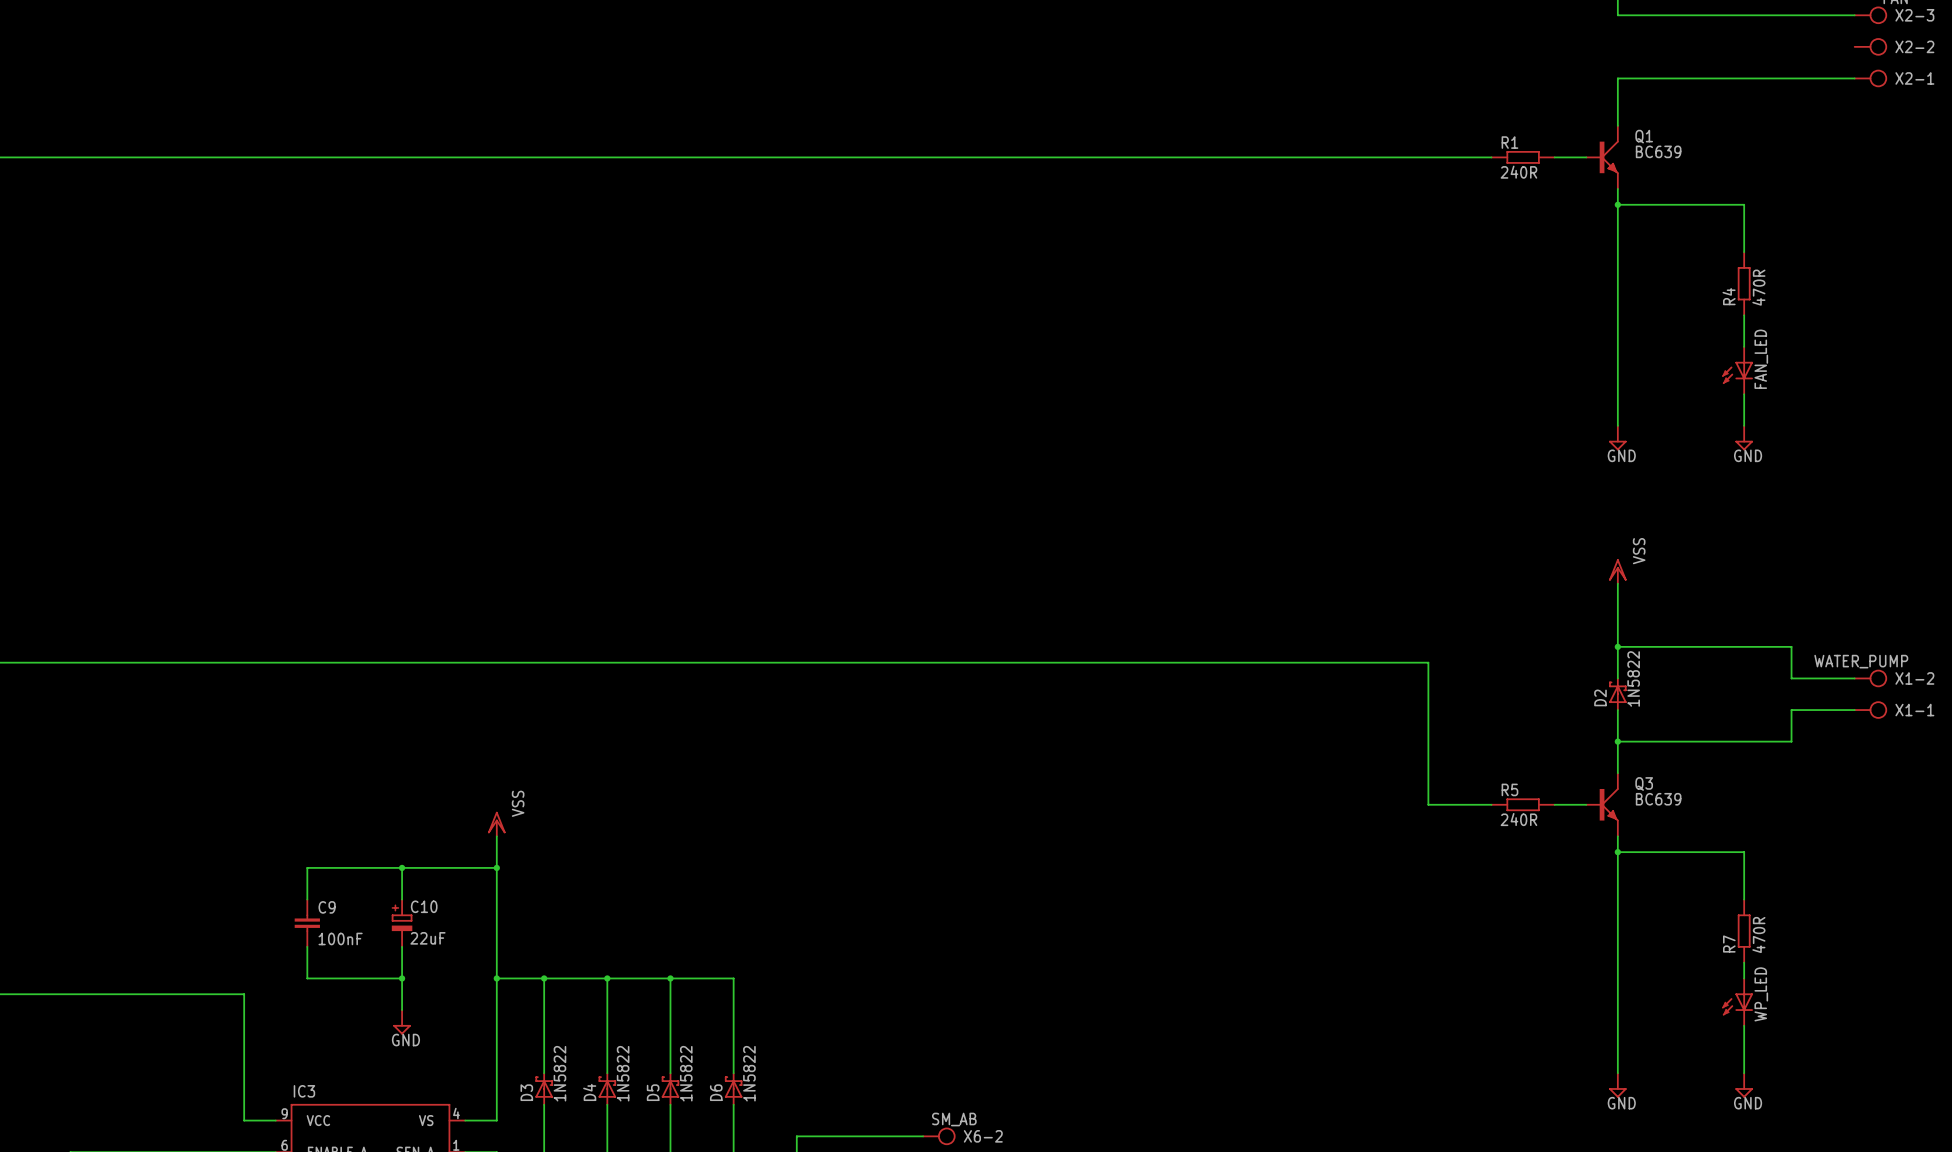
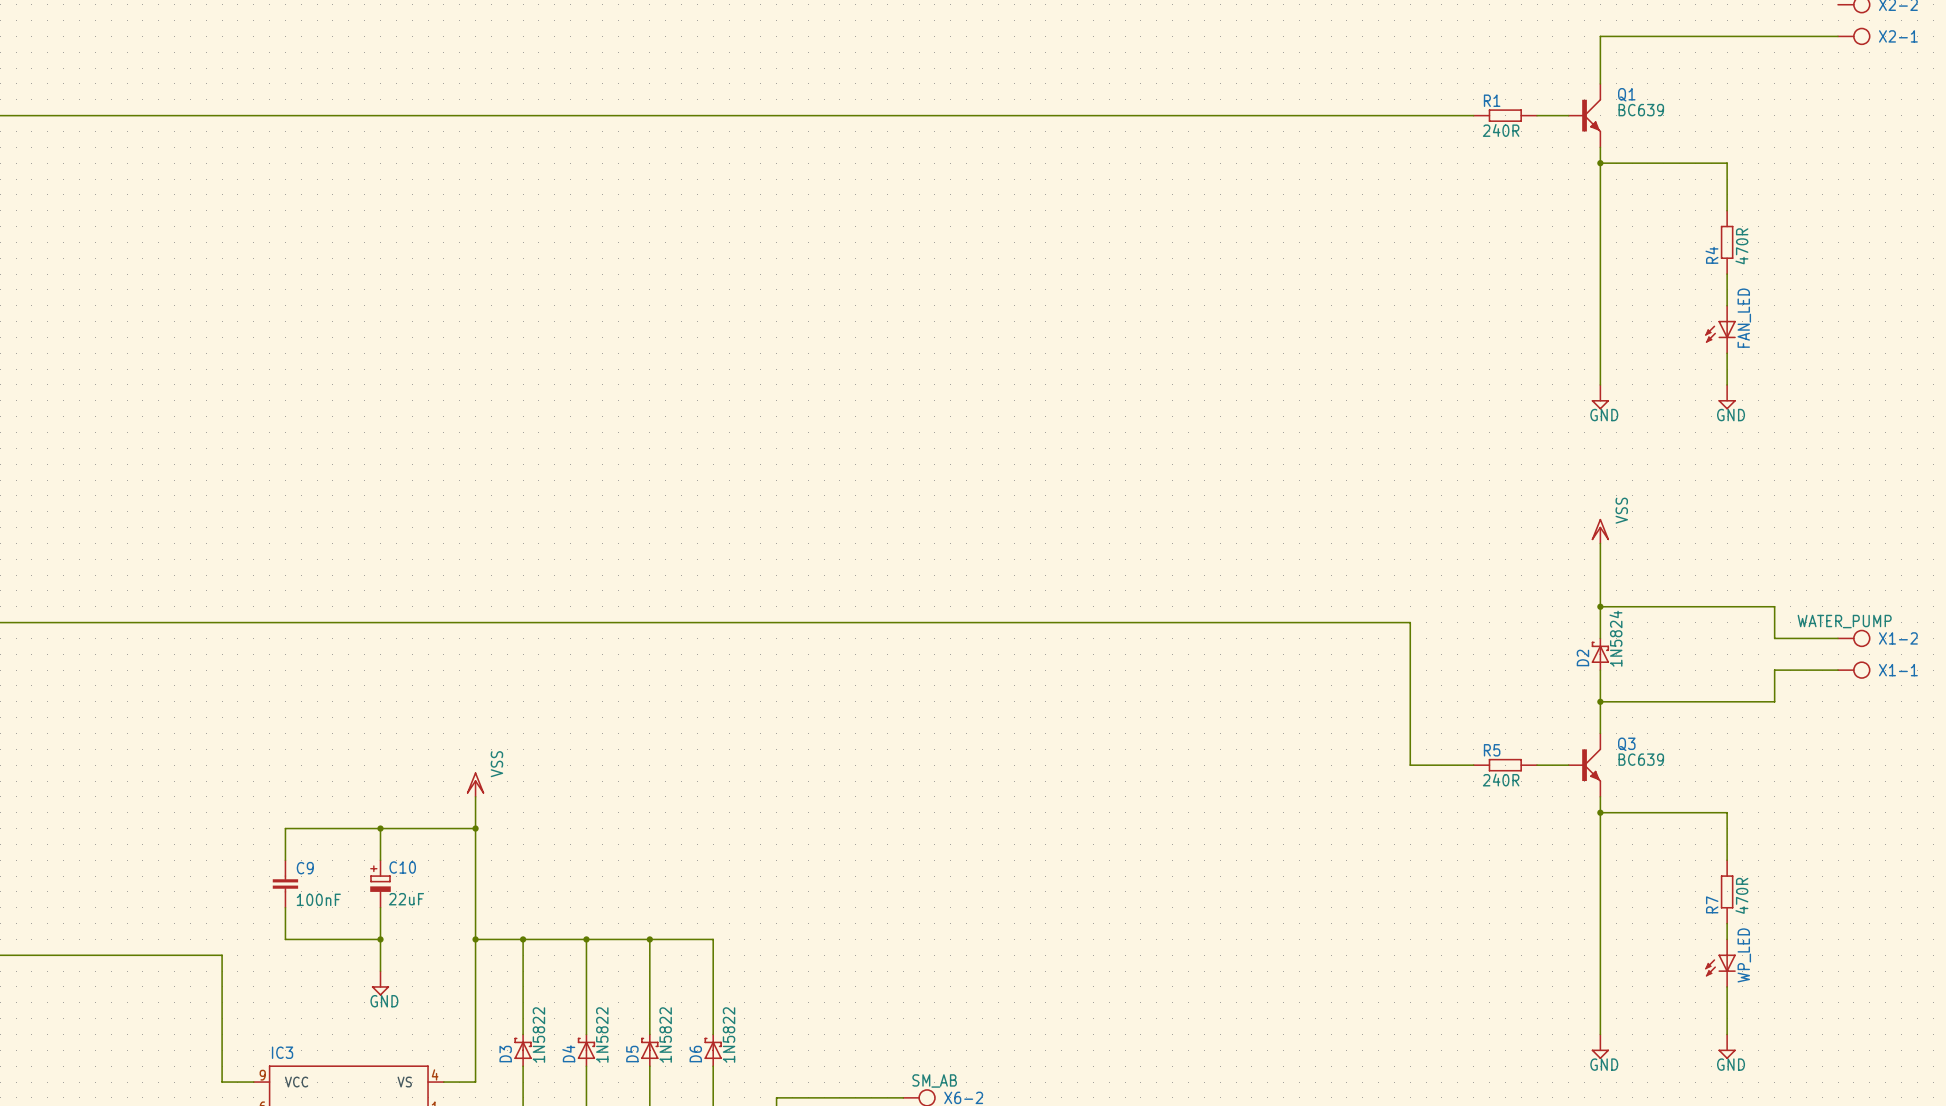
D2 value: 1N5822 (1633, 678) -> 1N5824 (1615, 638)

